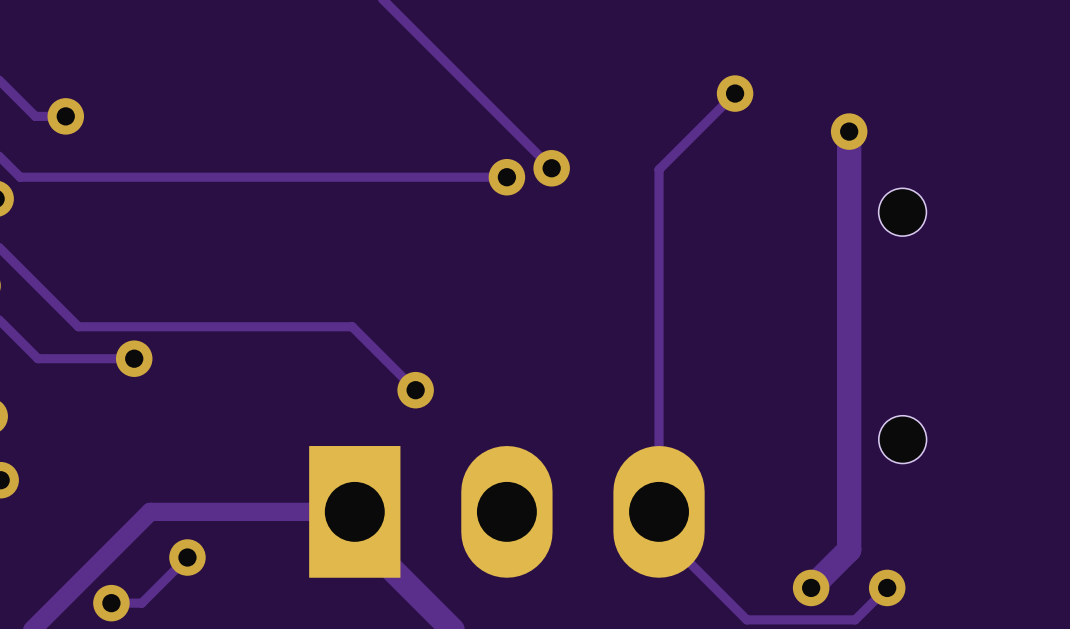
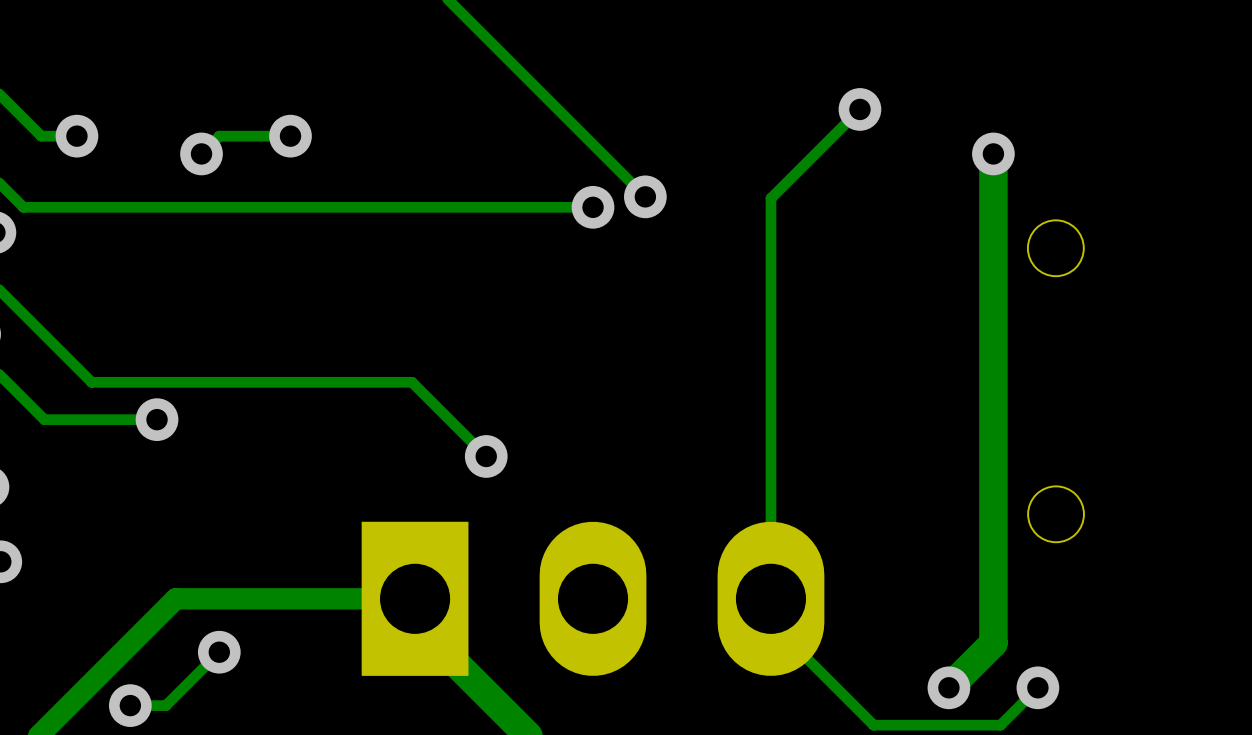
track: none -> (290, 136) (219, 136) (201, 153)
via: none -> (290, 136)
via: none -> (201, 153)

